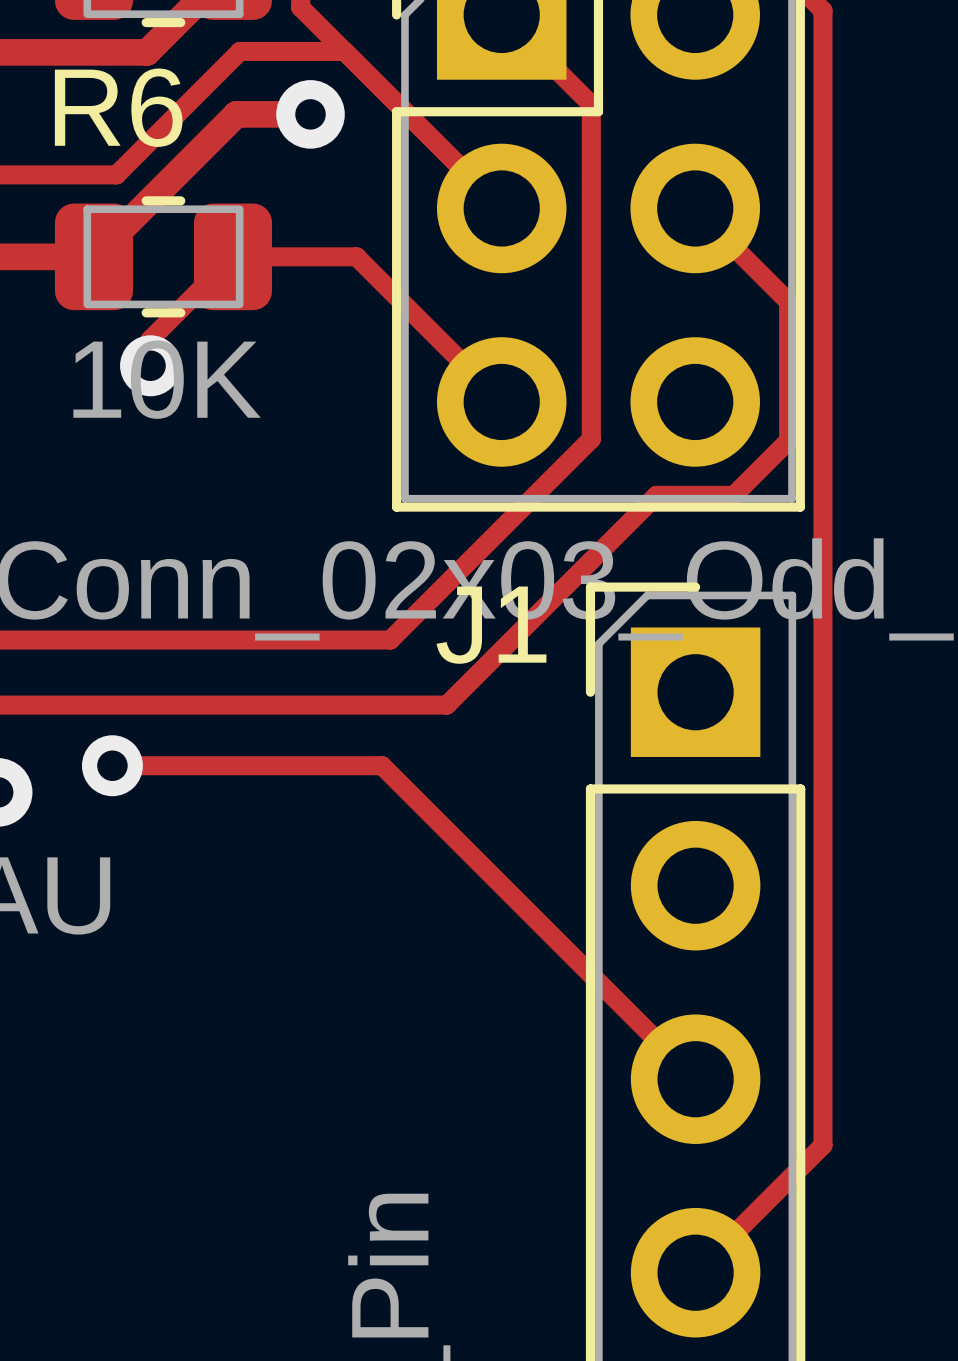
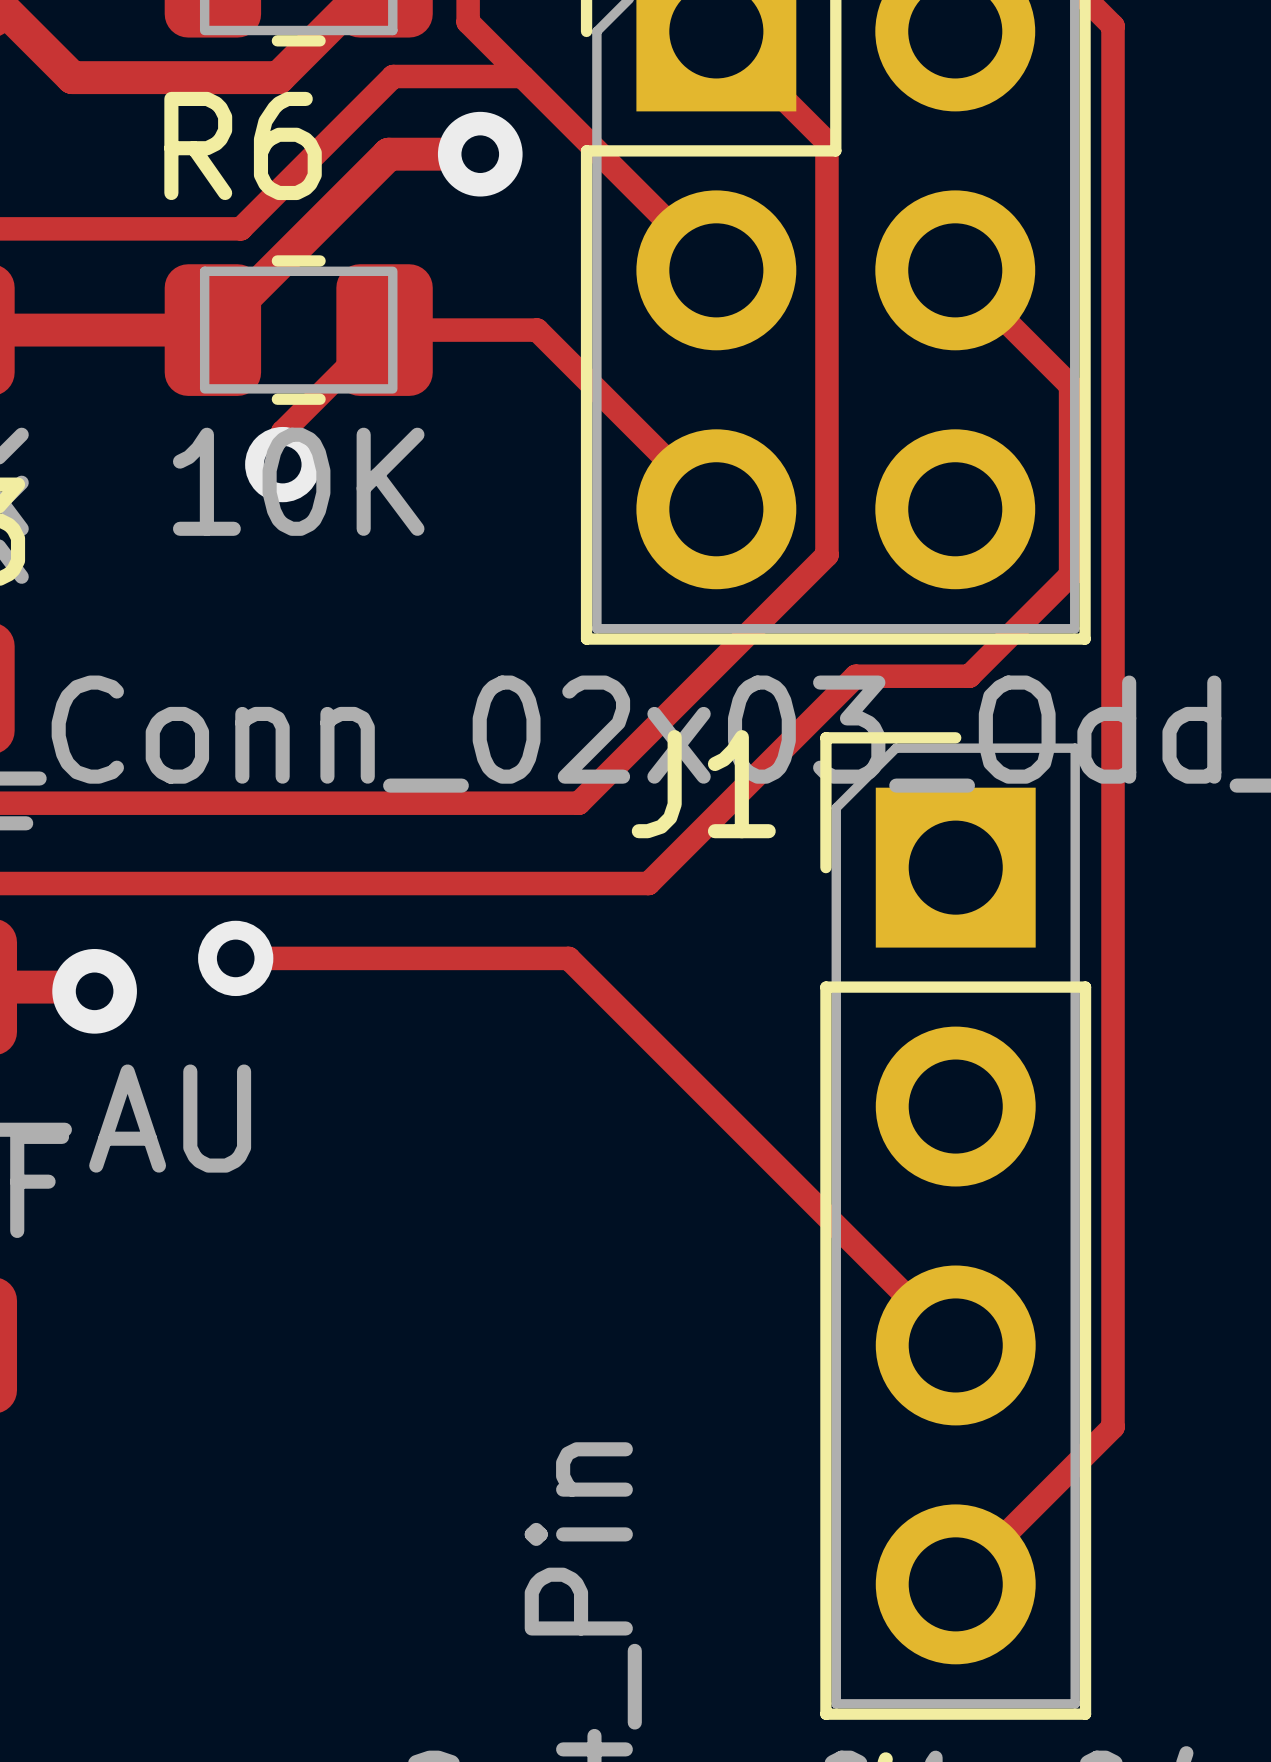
track: (788, 440) (733, 495) (656, 495) (614, 537) -> (1070, 557) (1070, 575) (969, 676) (855, 676)

